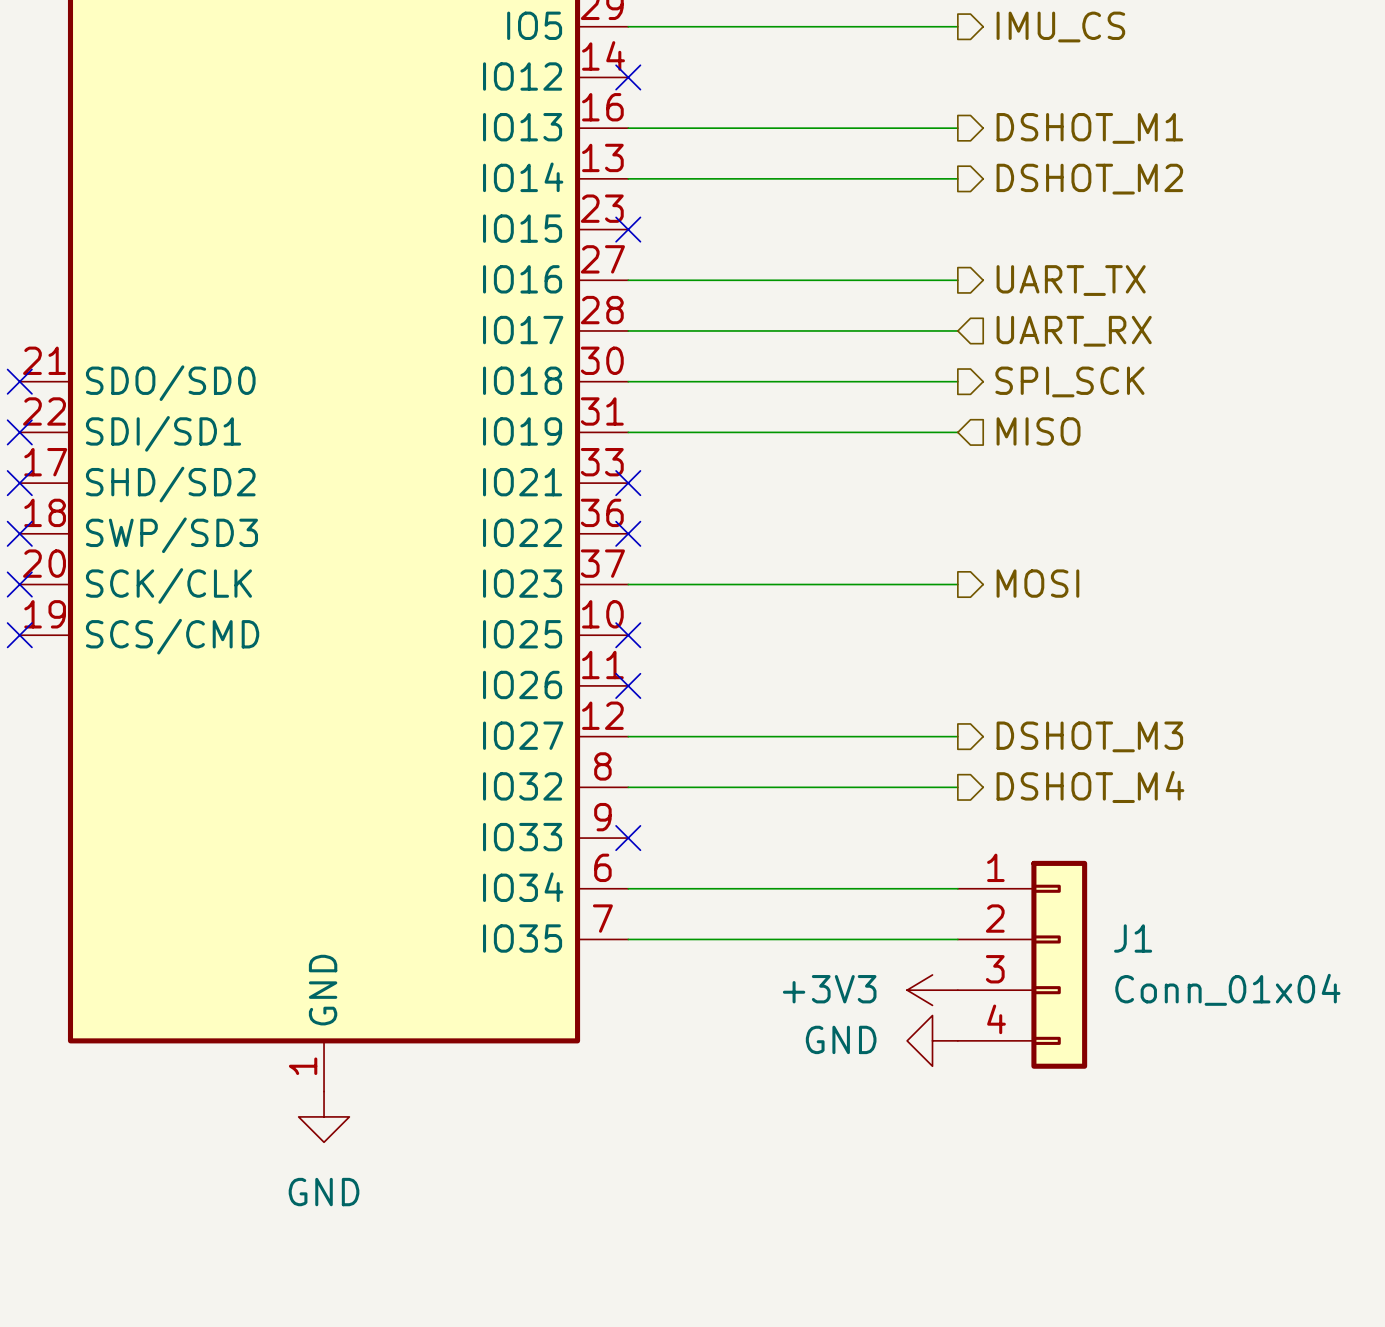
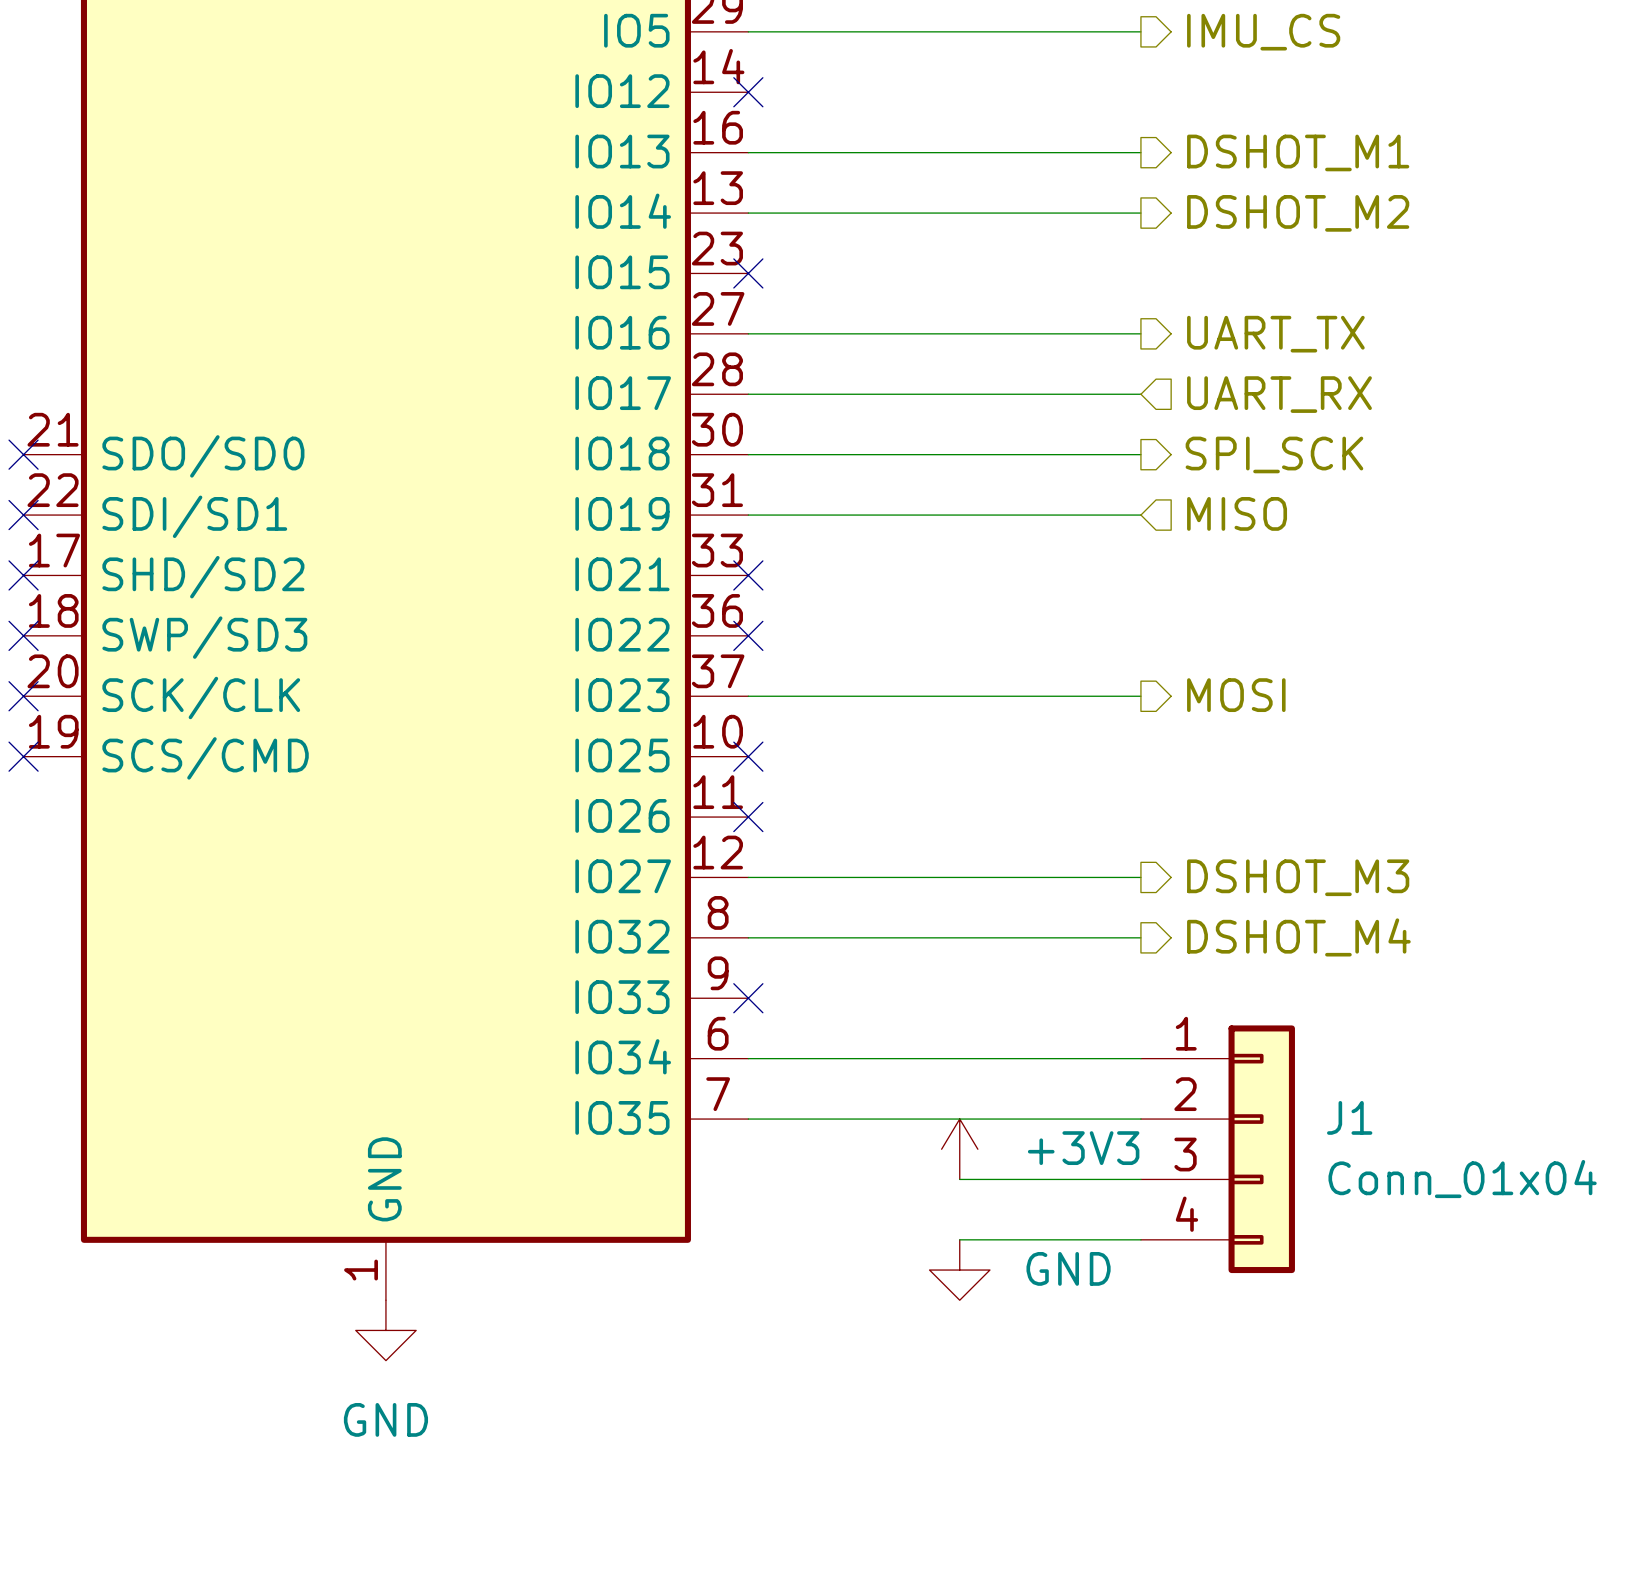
power symbol text position: +3V3 (829, 989) -> +3V3 (1083, 1148)
wire: none -> (959, 1179) (1140, 1179)
power symbol rotation: 0° (932, 990) -> 90° clockwise (959, 1149)
power symbol position: +3V3 (932, 990) -> +3V3 (959, 1149)
power symbol text position: GND (841, 1039) -> GND (1068, 1268)
wire: none -> (959, 1239) (1140, 1239)
power symbol rotation: 0° (932, 1040) -> 90° counterclockwise (959, 1270)
power symbol position: GND (932, 1040) -> GND (959, 1270)

